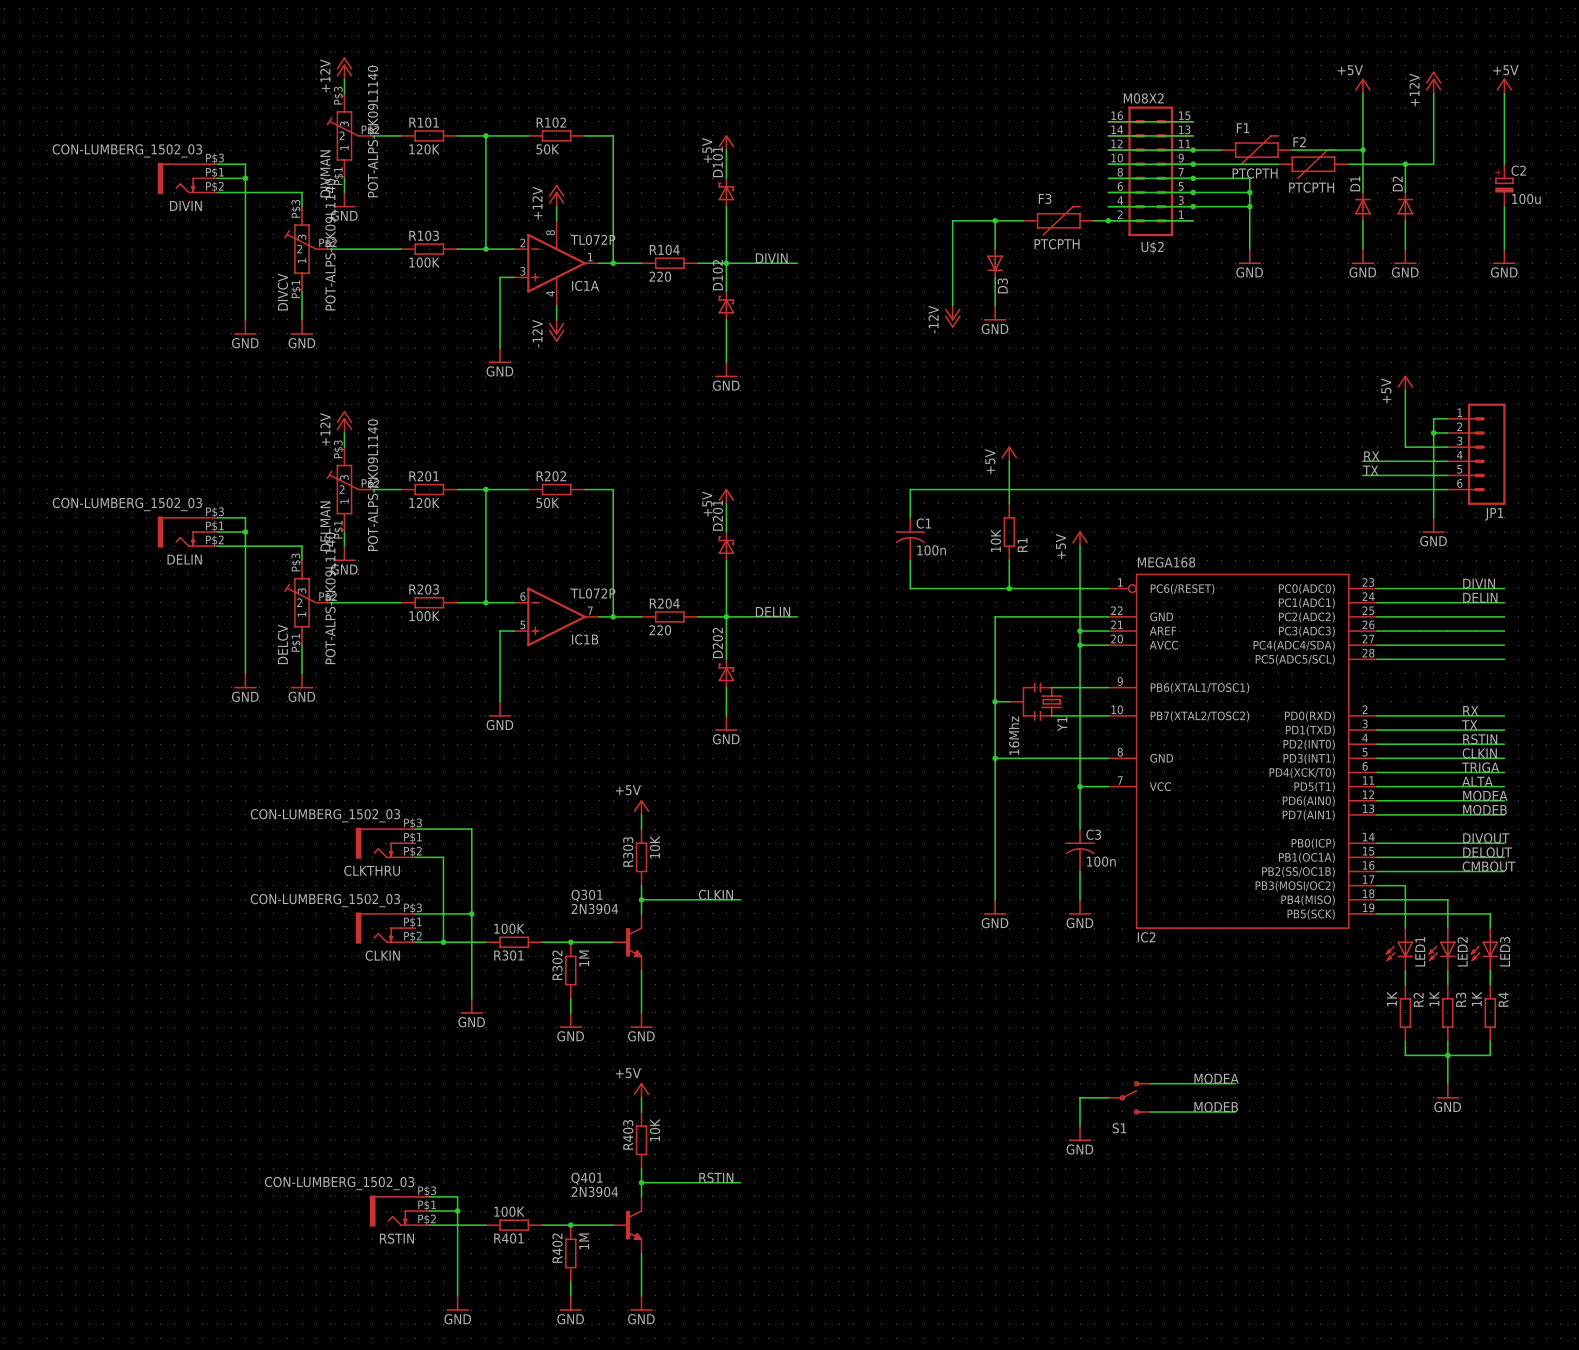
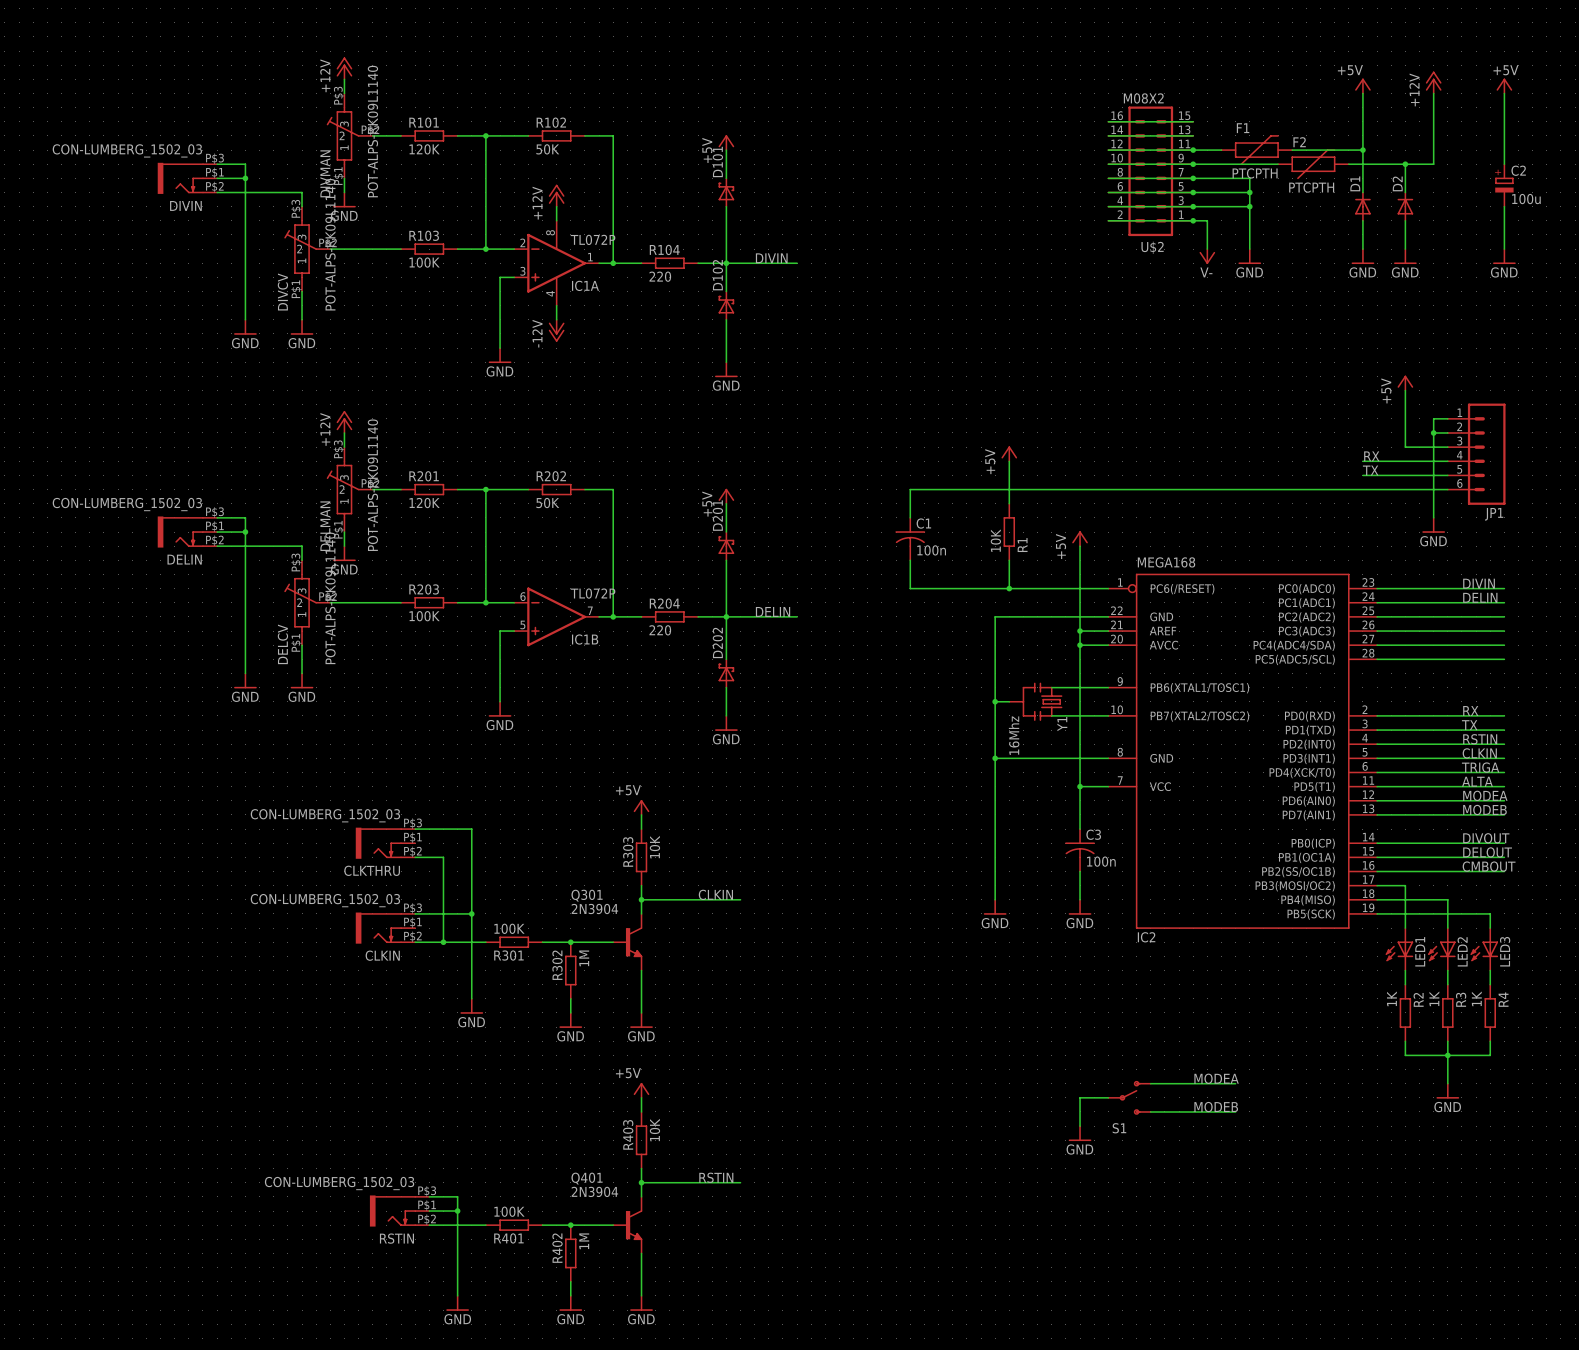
wire: (995, 220) (995, 249) -> none
junction: (995, 220) -> none
wire: (1023, 220) (952, 220) (952, 305) -> none
F3: PTCPTH (1058, 220) -> none
wire: (1094, 220) (1108, 220) -> none
junction: (1108, 220) -> none
wire: none -> (1193, 220) (1207, 220) (1207, 249)
junction: none -> (1193, 220)
power symbol: none -> V- (1207, 256)
D3: (995, 263) -> none
wire: (995, 277) (995, 305) -> none
power symbol: GND (995, 313) -> none
power symbol: -12V (952, 316) -> none

